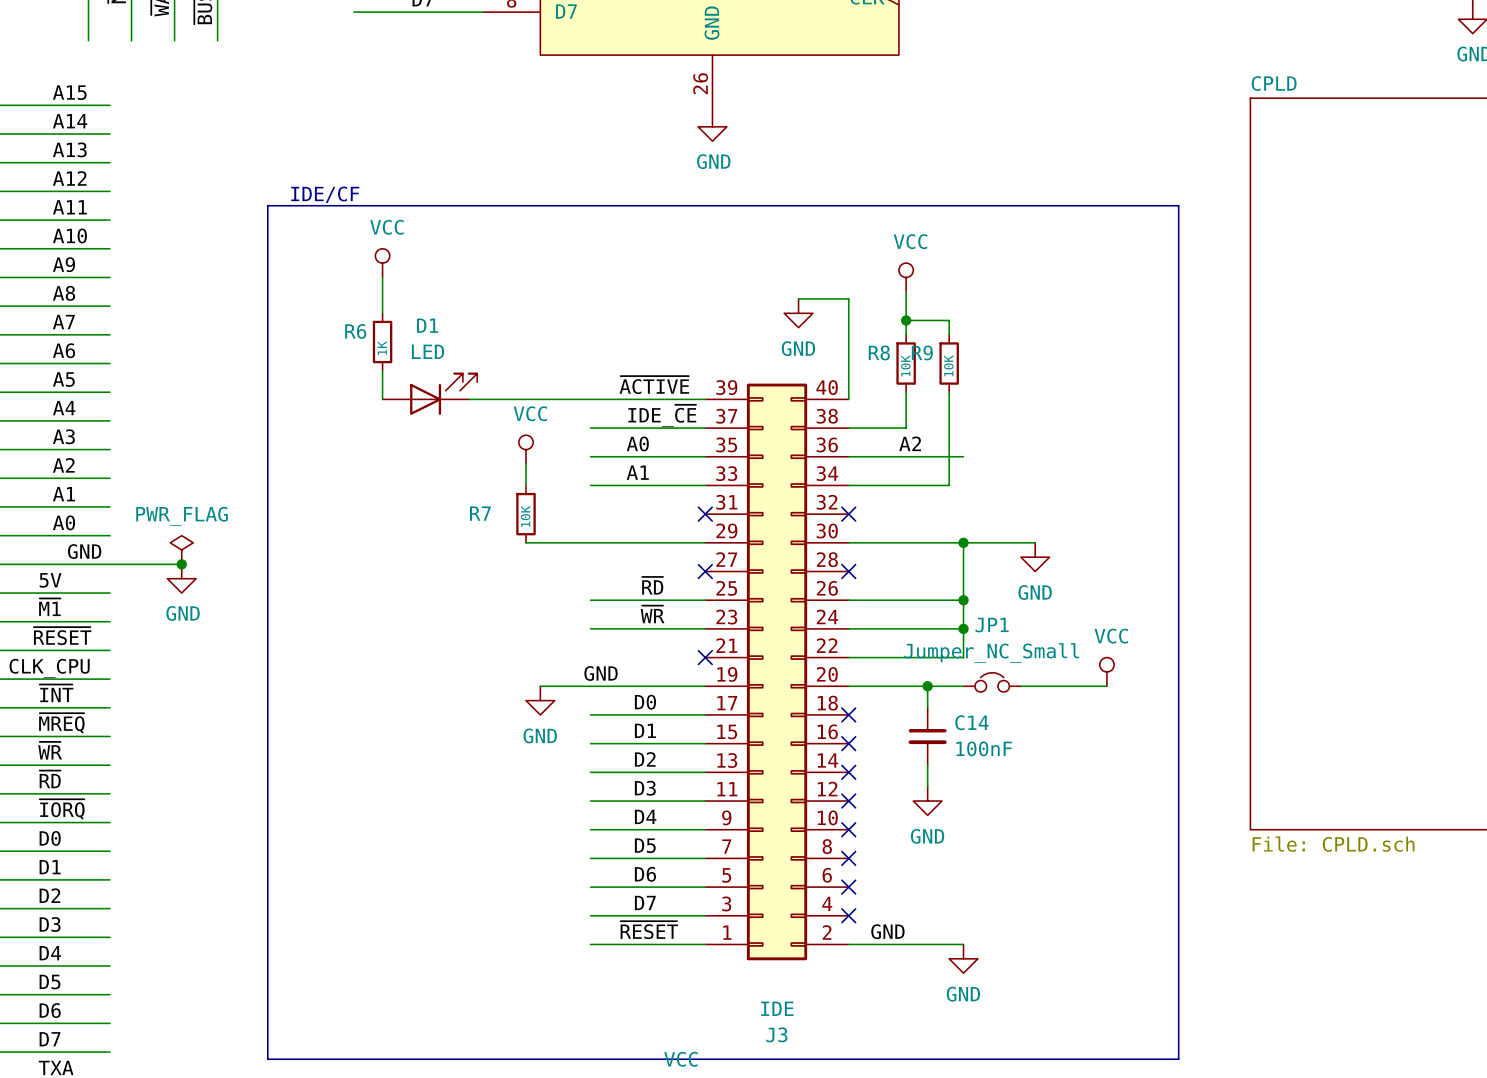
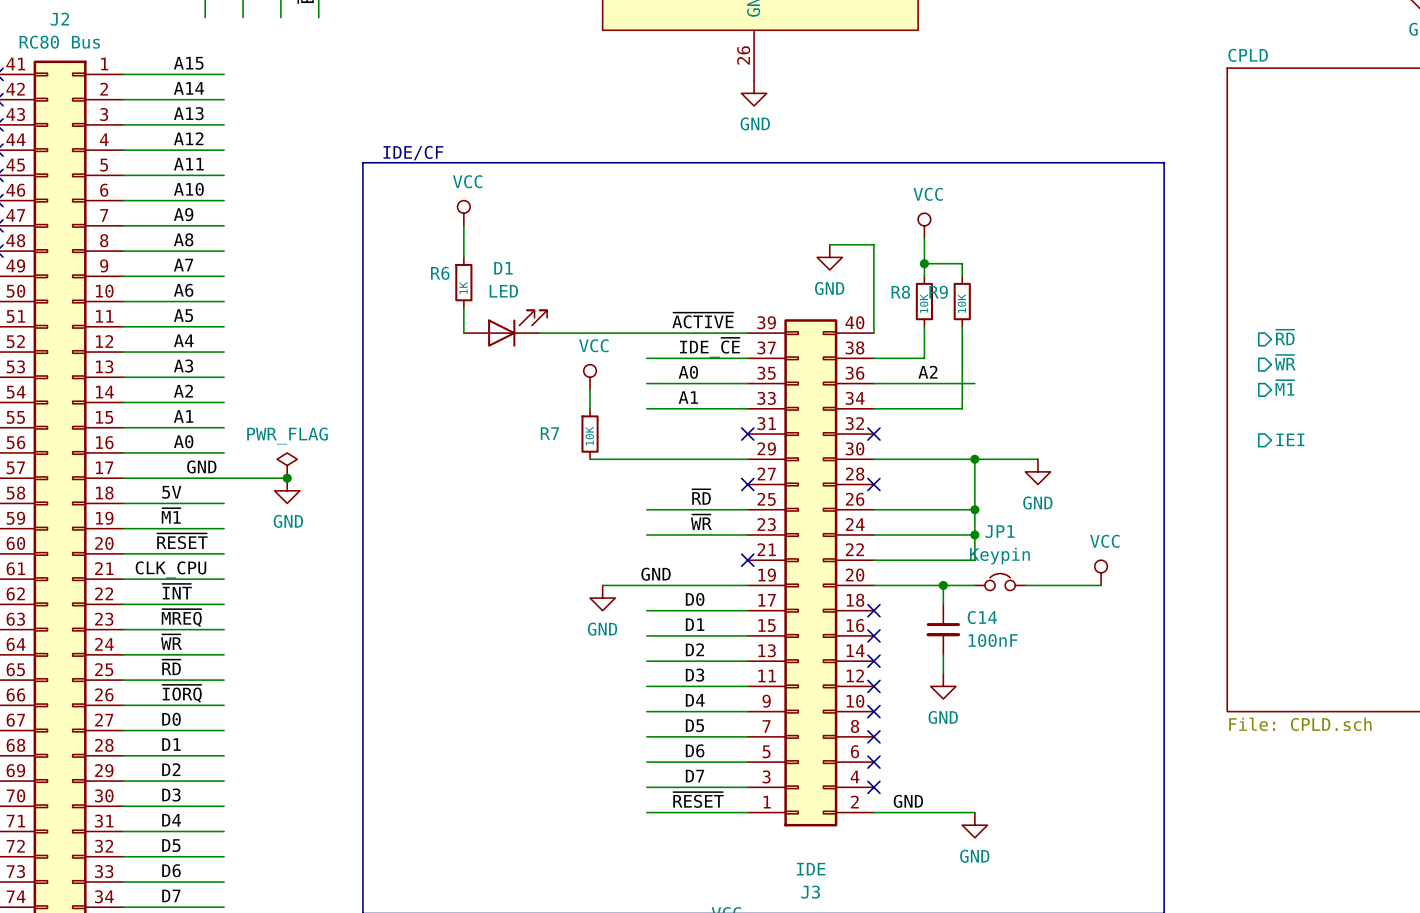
sheet pin: none -> ~{RD} (1285, 337)
sheet pin: none -> ~{WR} (1285, 362)
sheet pin: none -> ~{M1} (1285, 387)
sheet pin: none -> IEI (1290, 439)
JP1 value: Jumper_NC_Small (991, 652) -> Keypin (999, 555)

